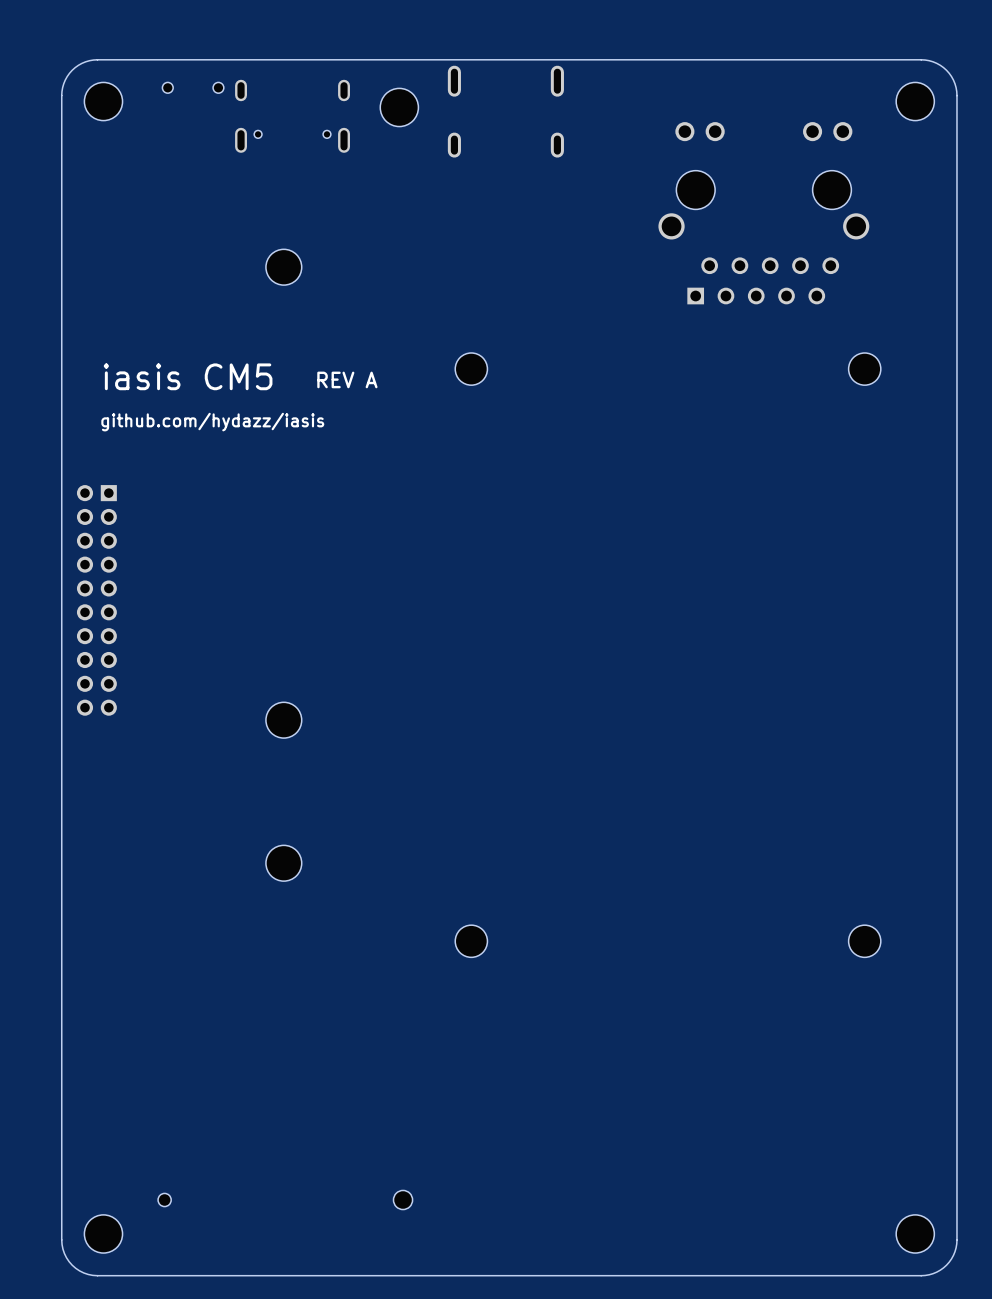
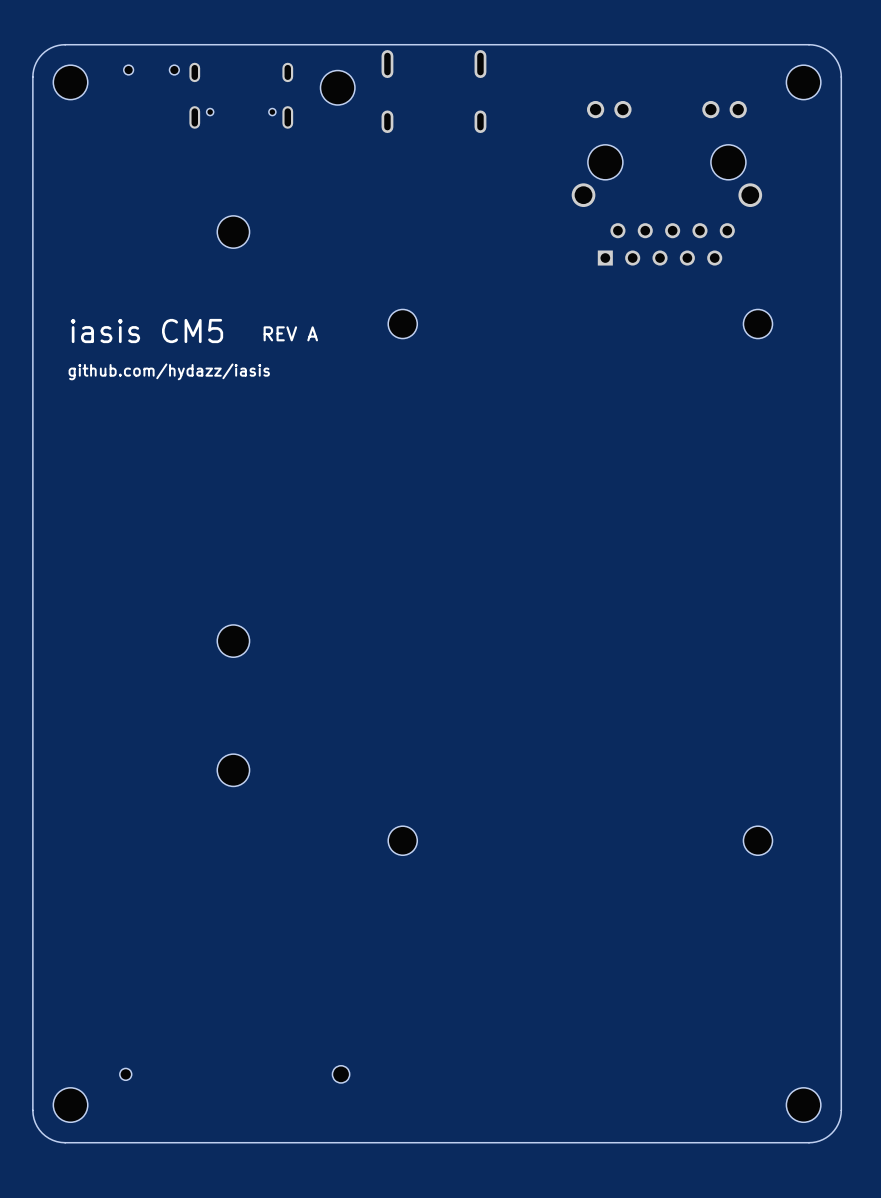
part: (96, 600) -> none

